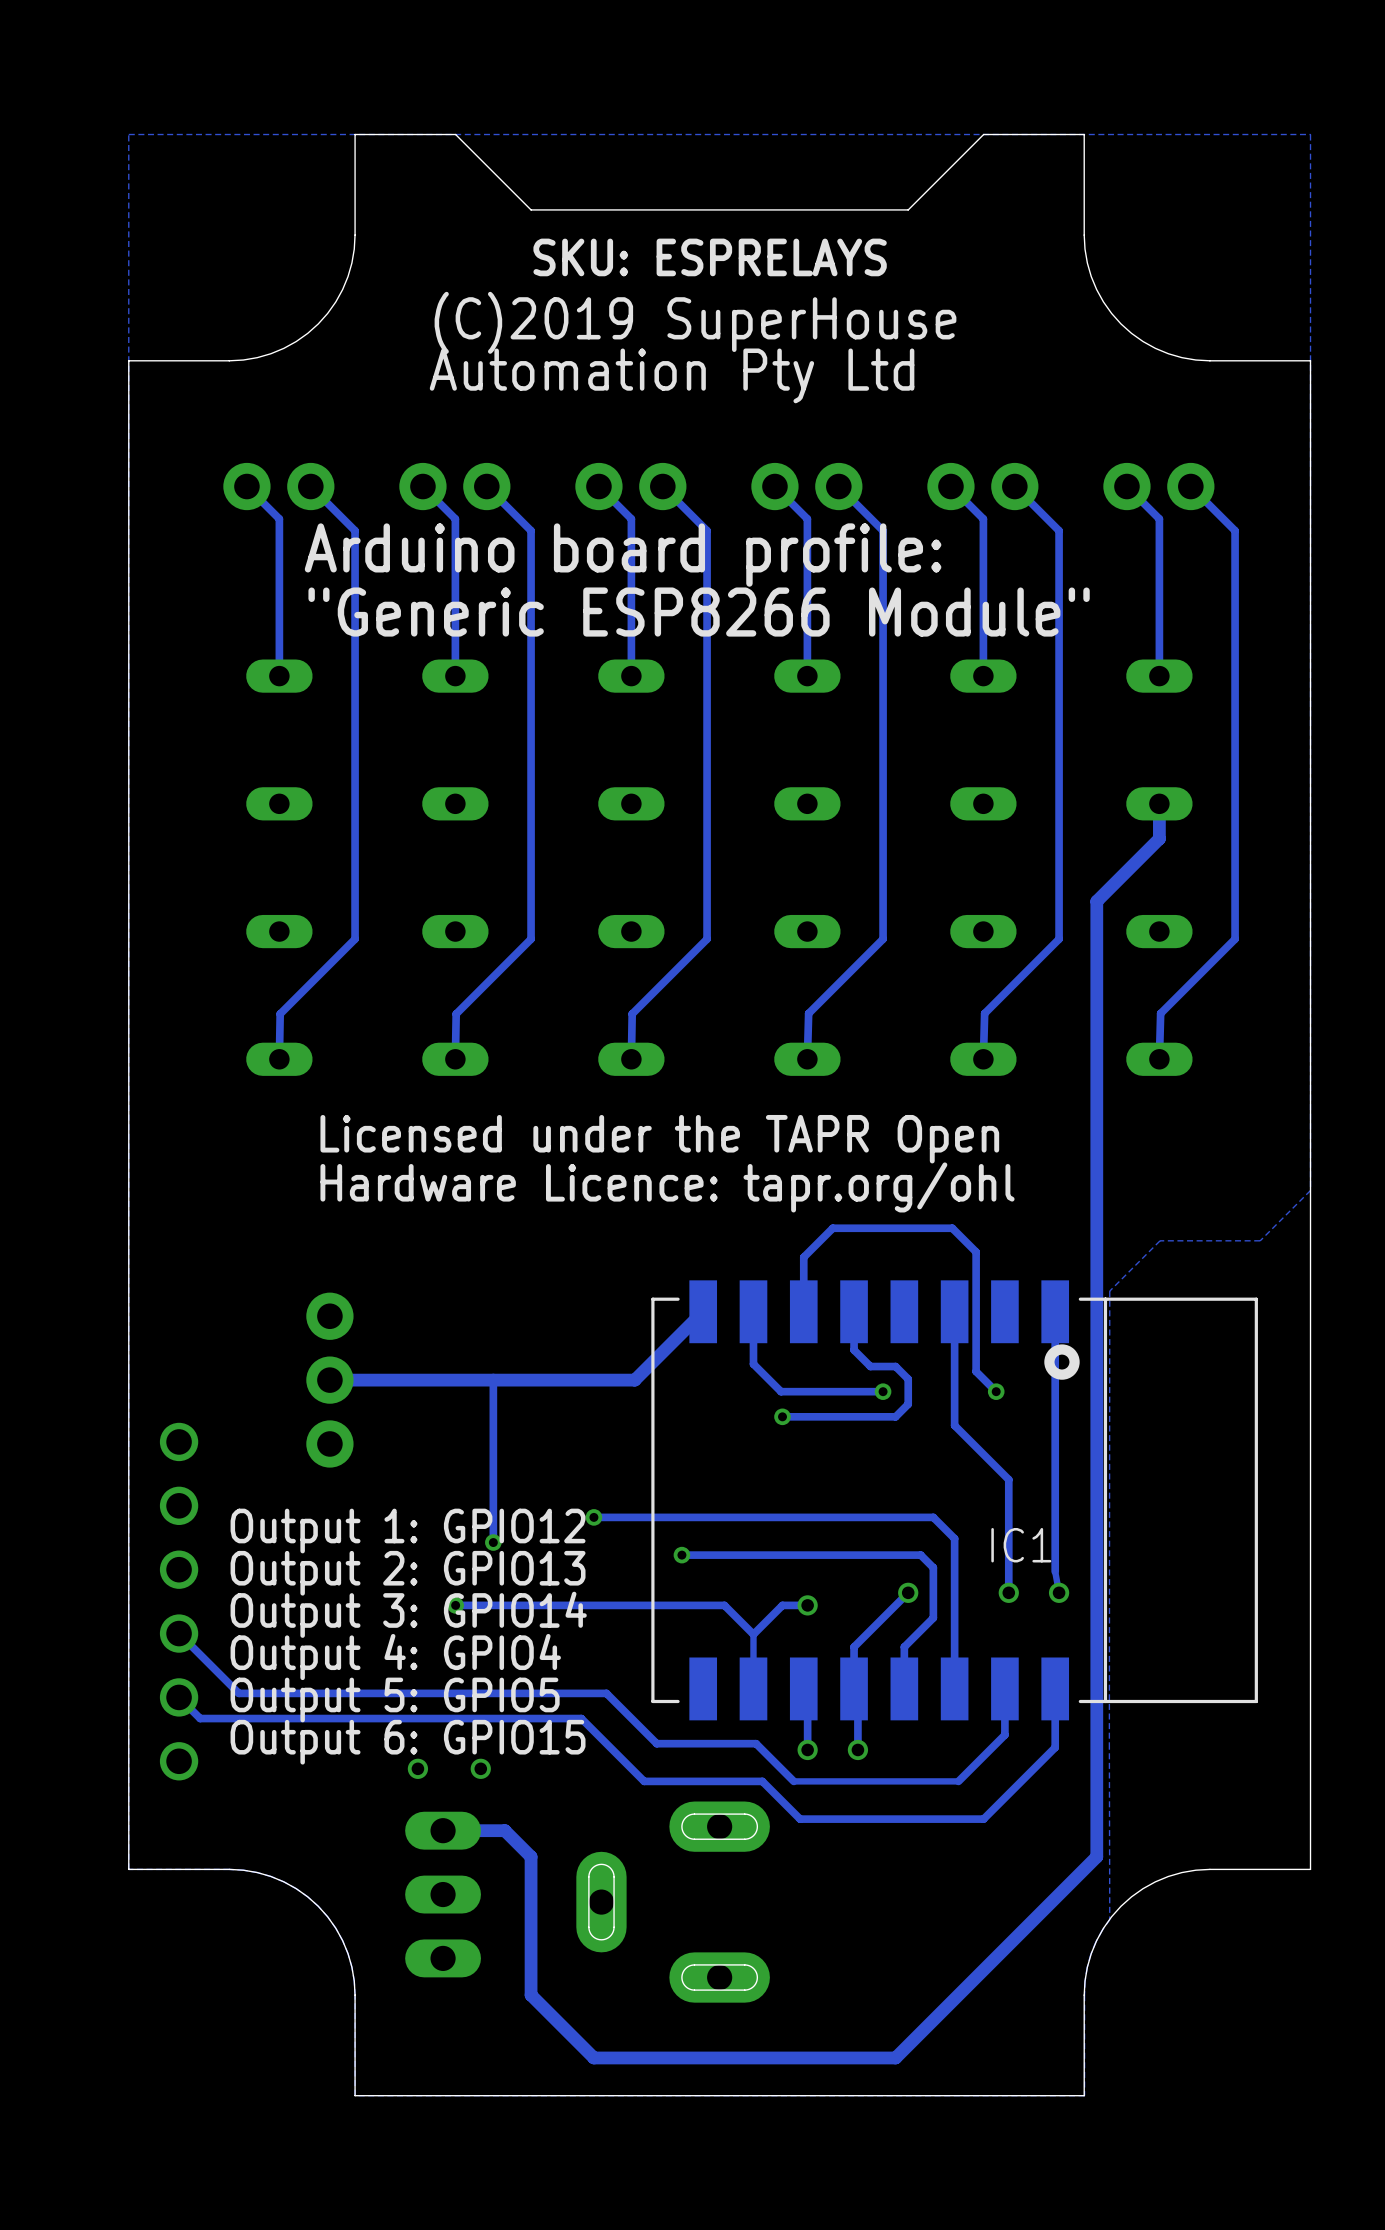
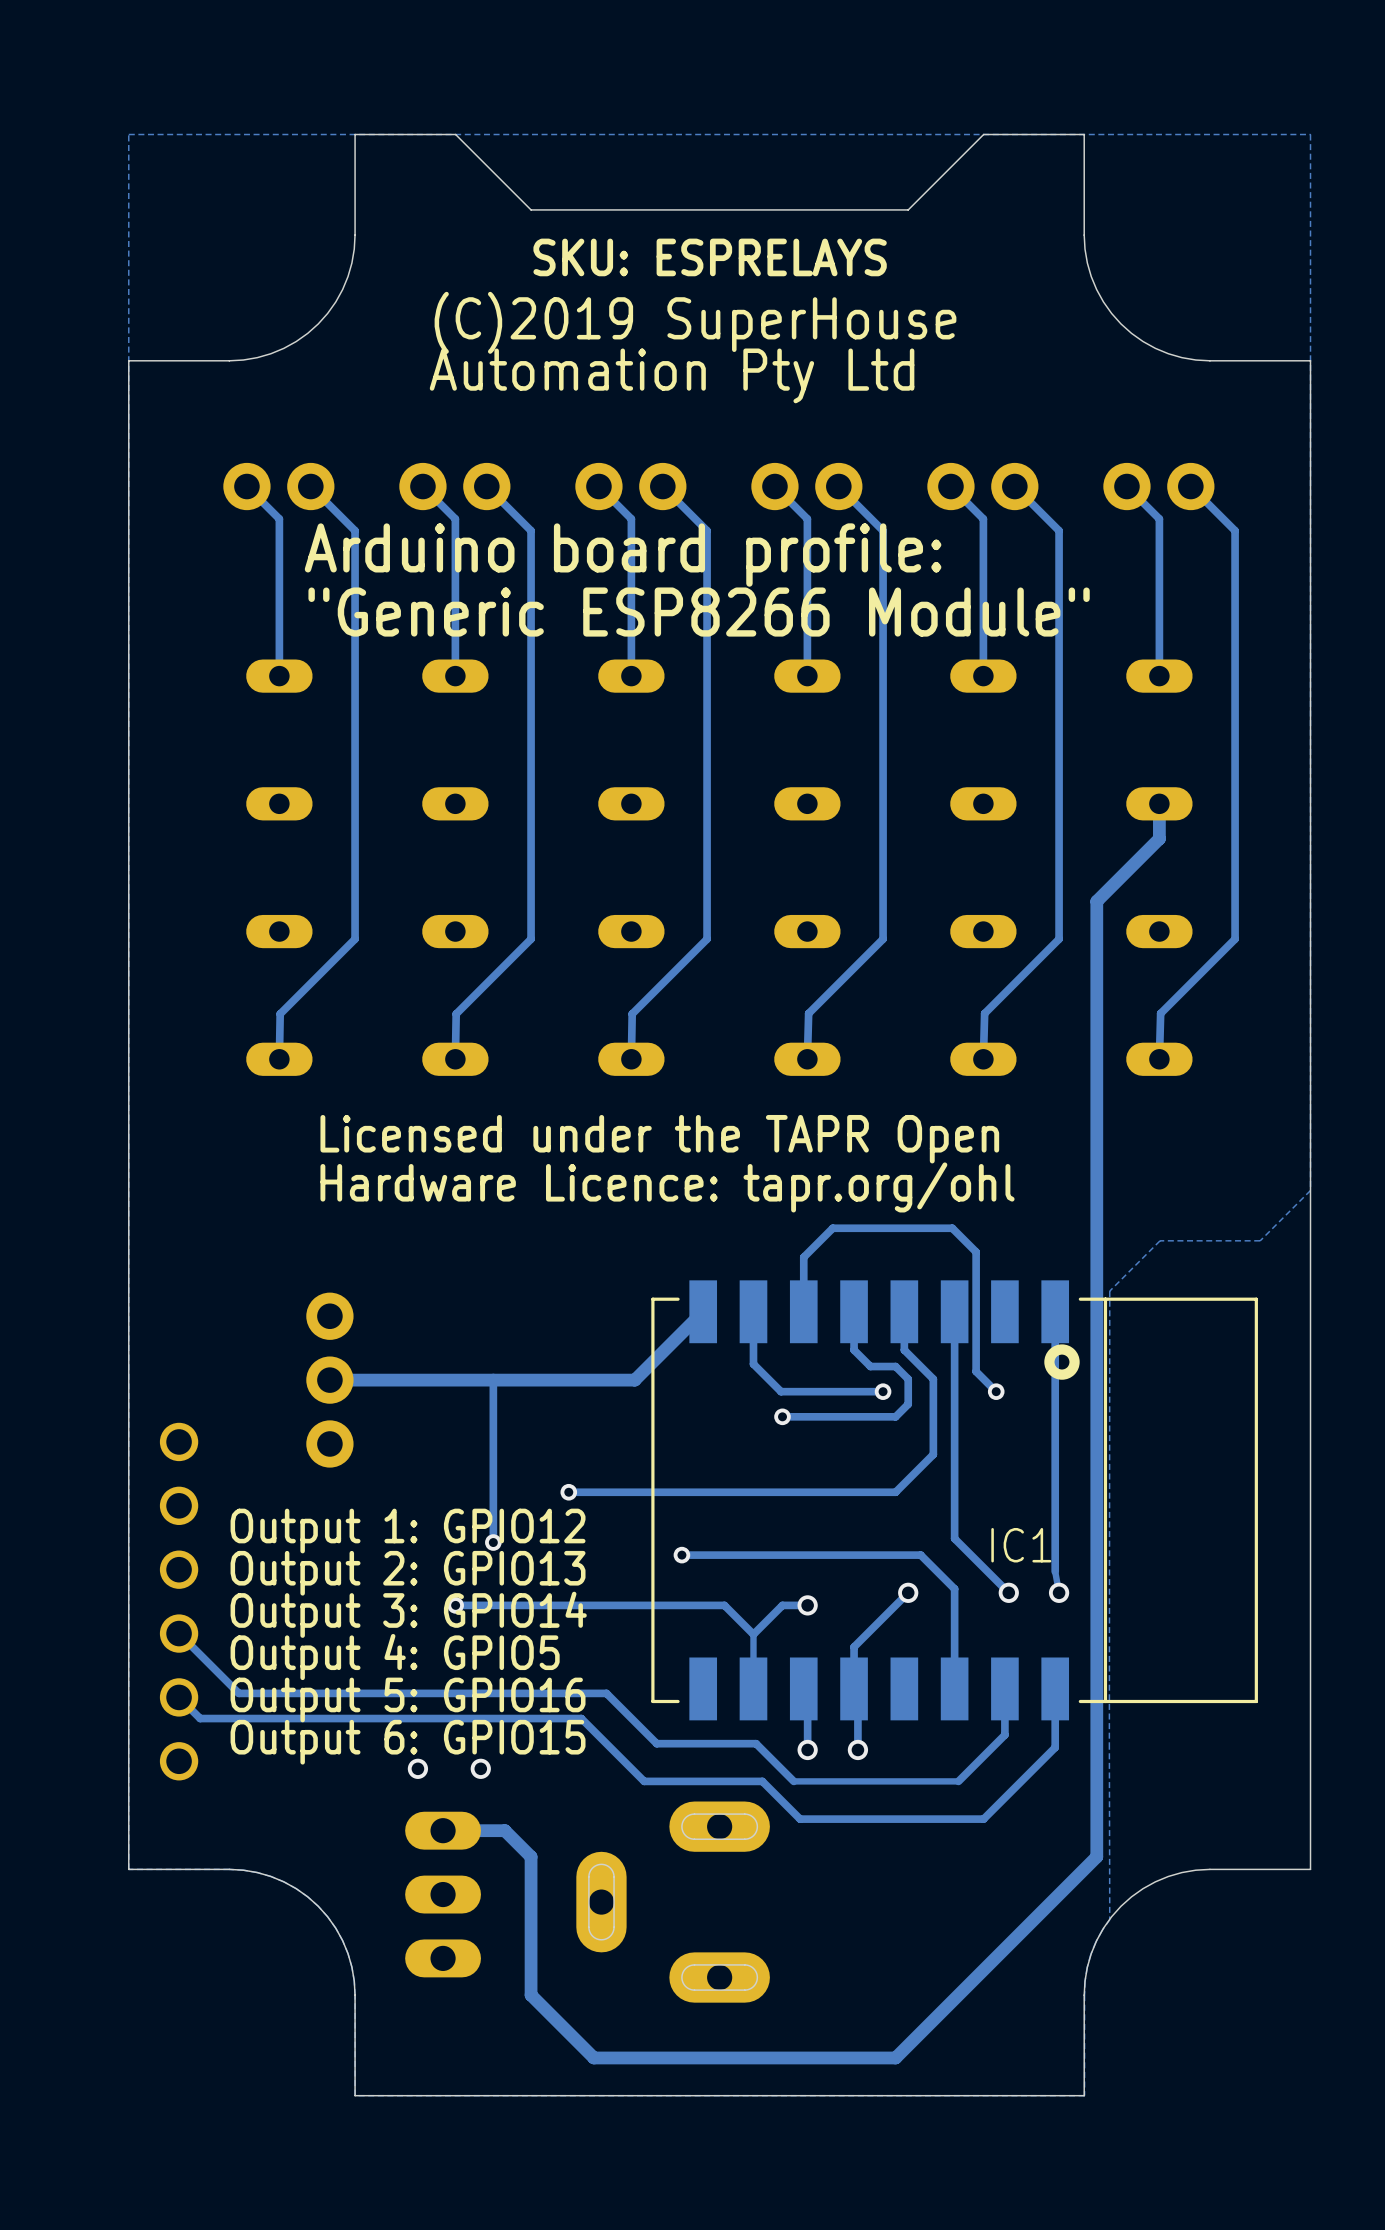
track: none -> (904, 1311) (904, 1350) (933, 1379) (933, 1454) (895, 1492) (568, 1492)
track: (954, 1425) (1008, 1479) (1008, 1592) -> (954, 1425) (954, 1538) (1008, 1592)
track: (593, 1517) (933, 1517) (954, 1538) (954, 1588) -> none
via position: (593, 1517) -> (568, 1492)
track: (933, 1567) (933, 1617) (904, 1646) (904, 1688) -> (933, 1567) (954, 1588)
text: Output 4: GPIO4 (395, 1657) -> Output 4: GPIO5 (395, 1657)
text: Output 5: GPIO5 (395, 1699) -> Output 5: GPIO16 (408, 1699)

